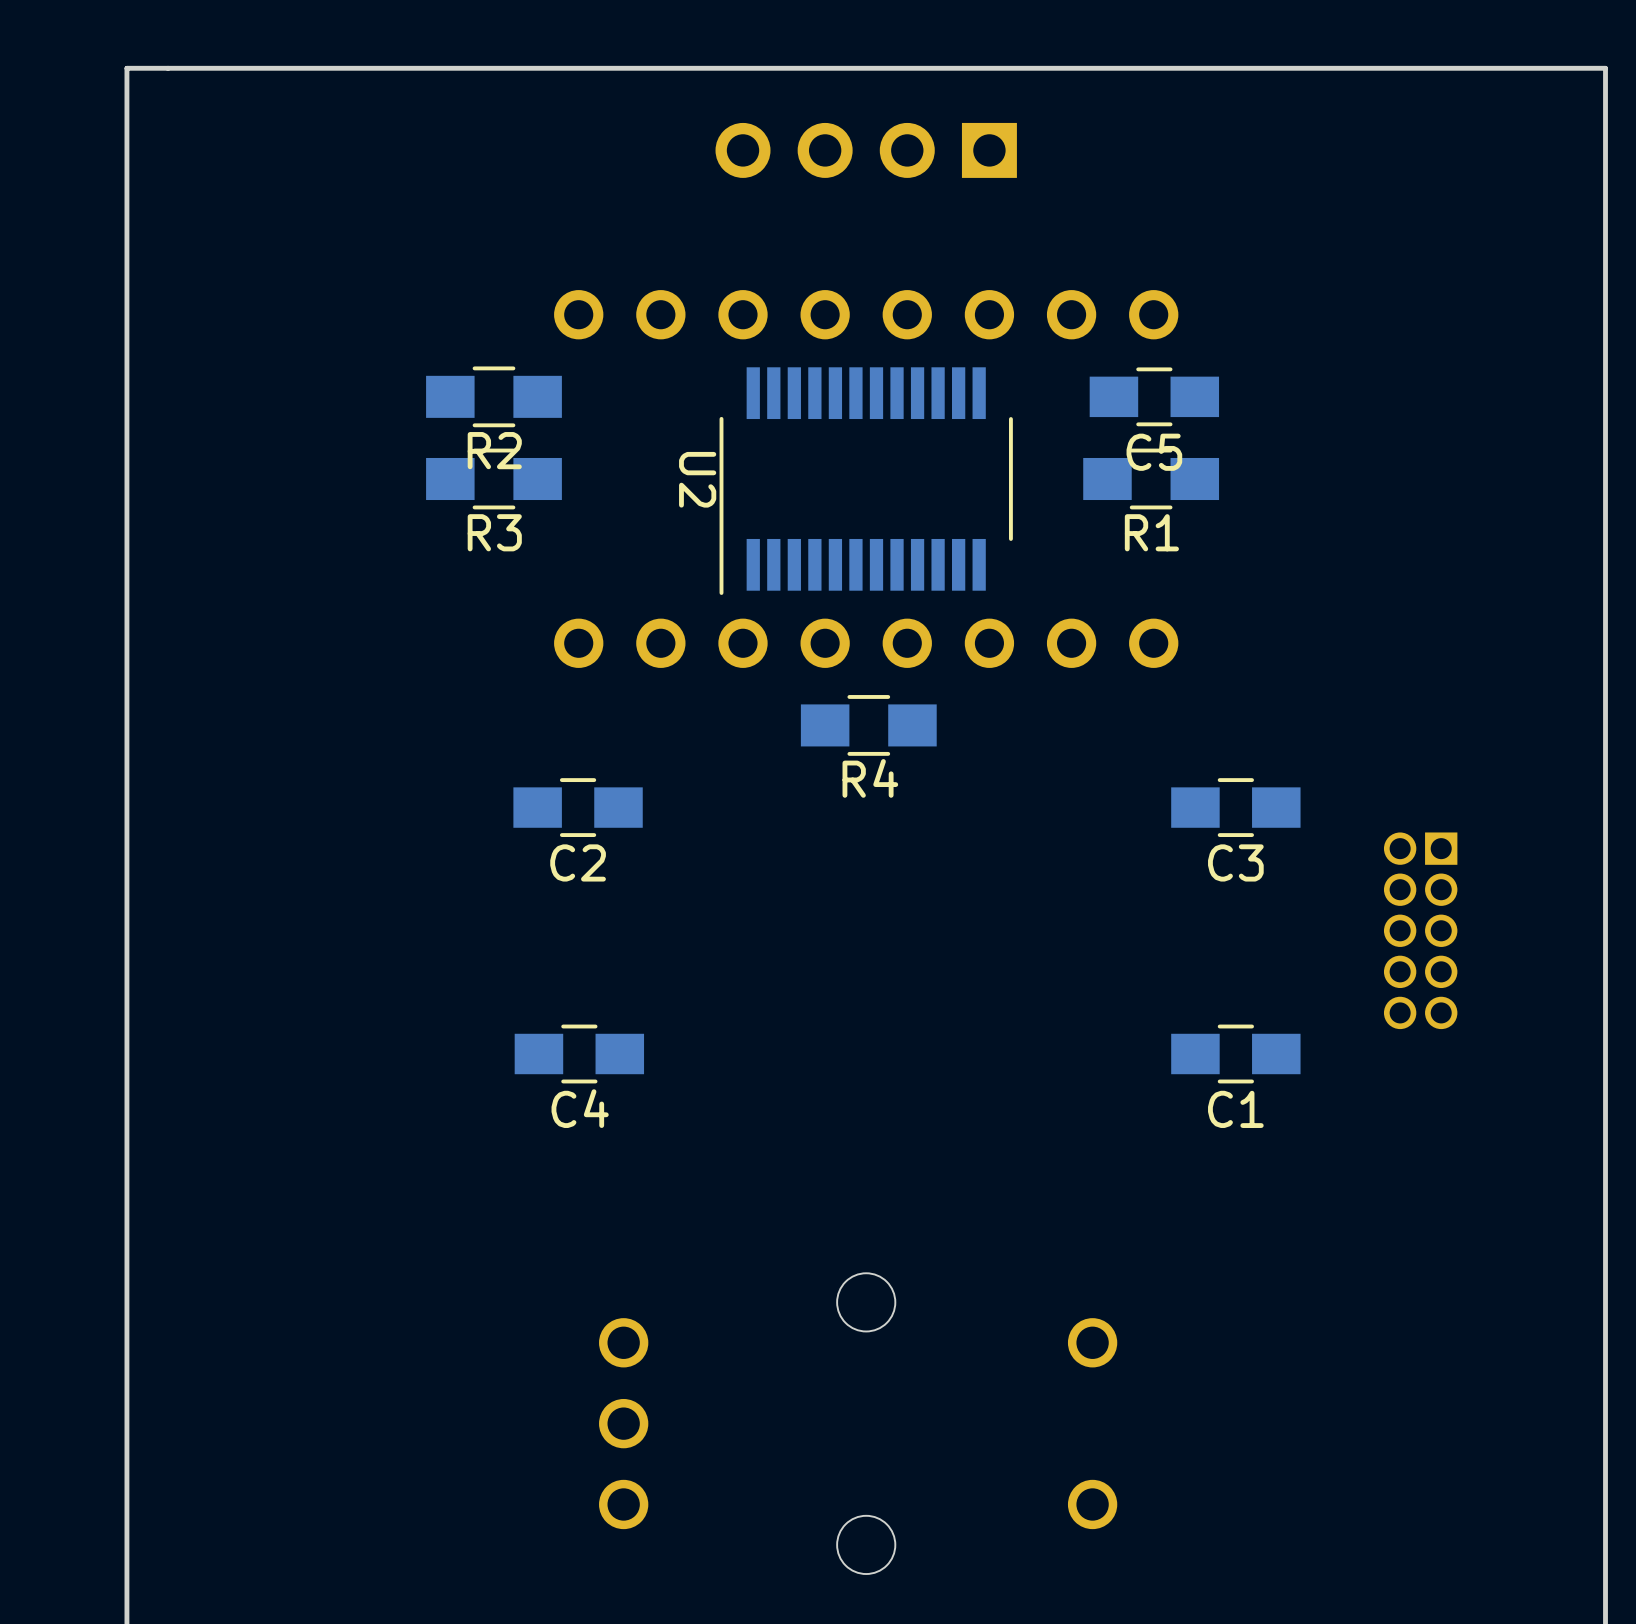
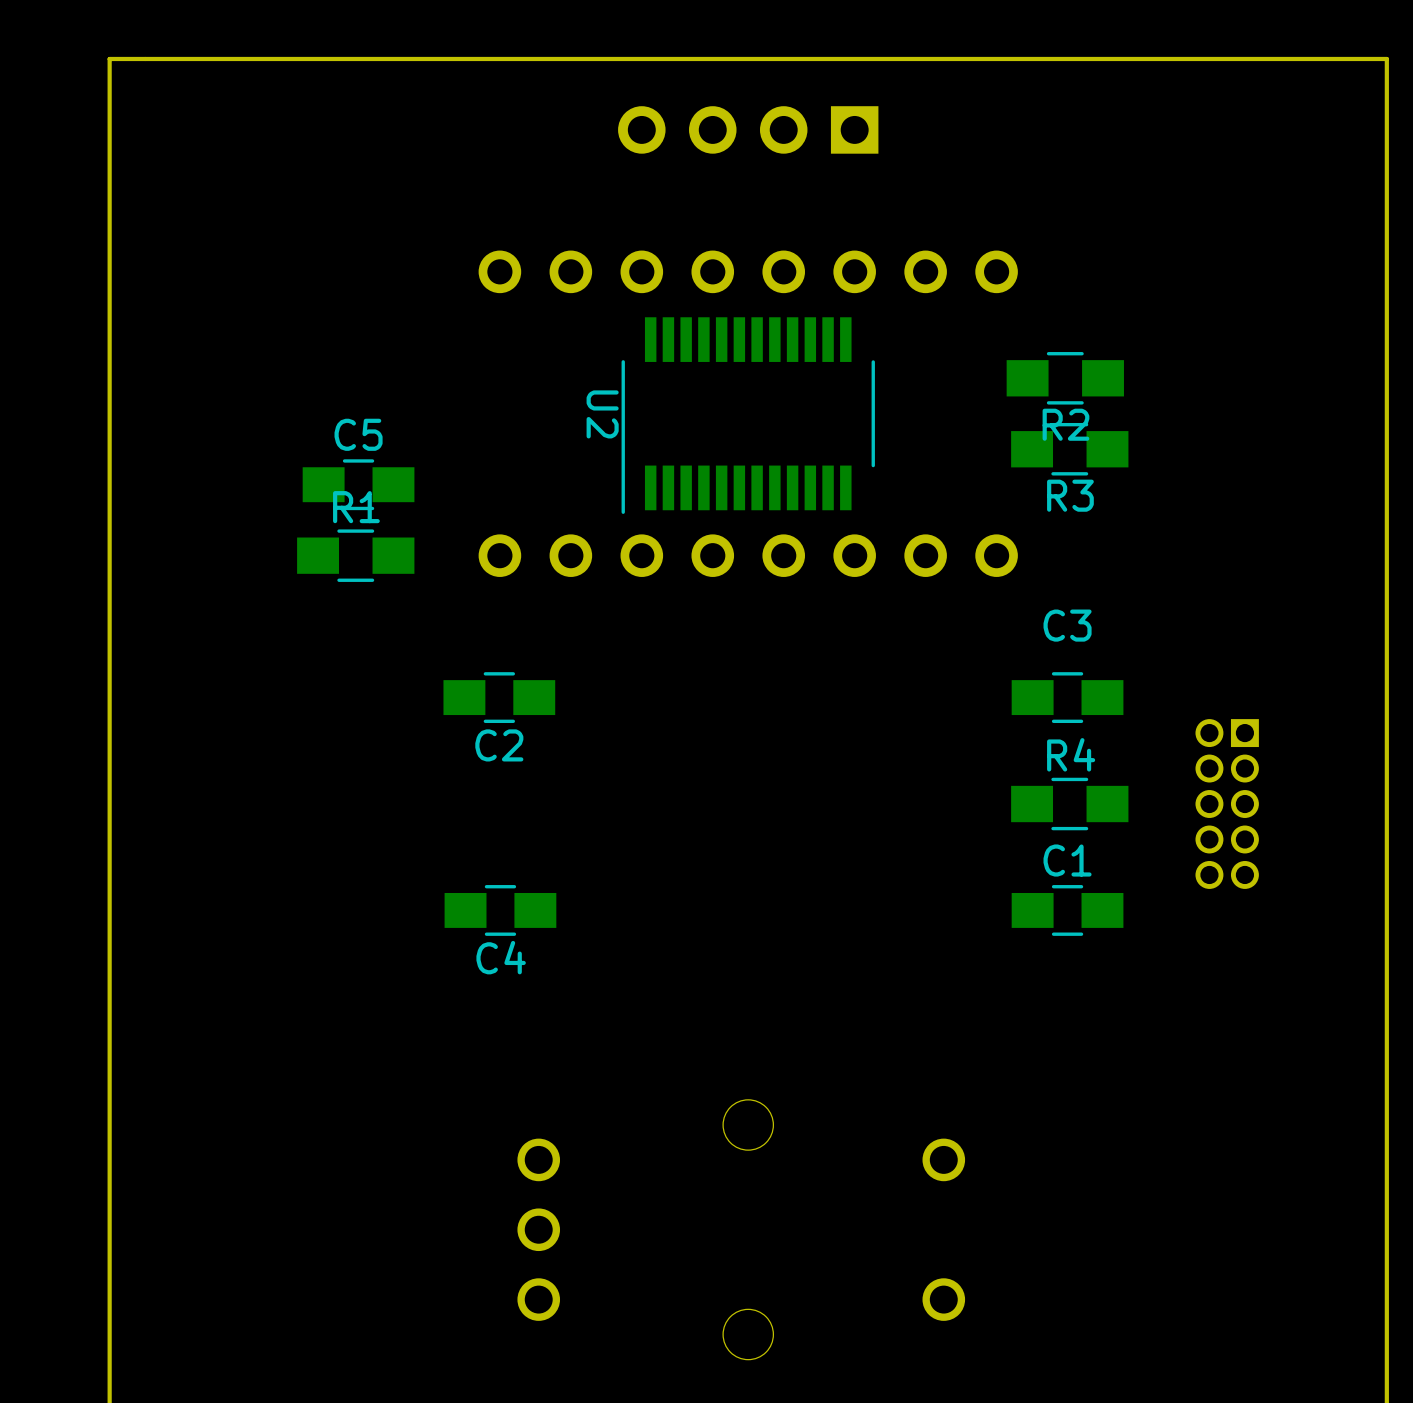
R2 position: (493, 396) -> (1065, 378)
C5 position: (1154, 396) -> (358, 484)
C5 name position: C5 (1154, 452) -> C5 (358, 434)
R3 position: (493, 479) -> (1069, 449)
R1 position: (1151, 479) -> (355, 555)
R1 name position: R1 (1151, 532) -> R1 (356, 507)
R4 position: (868, 725) -> (1069, 804)
R4 name position: R4 (870, 778) -> R4 (1071, 754)
C3 name position: C3 (1235, 862) -> C3 (1067, 625)
C1 name position: C1 (1235, 1109) -> C1 (1067, 860)

